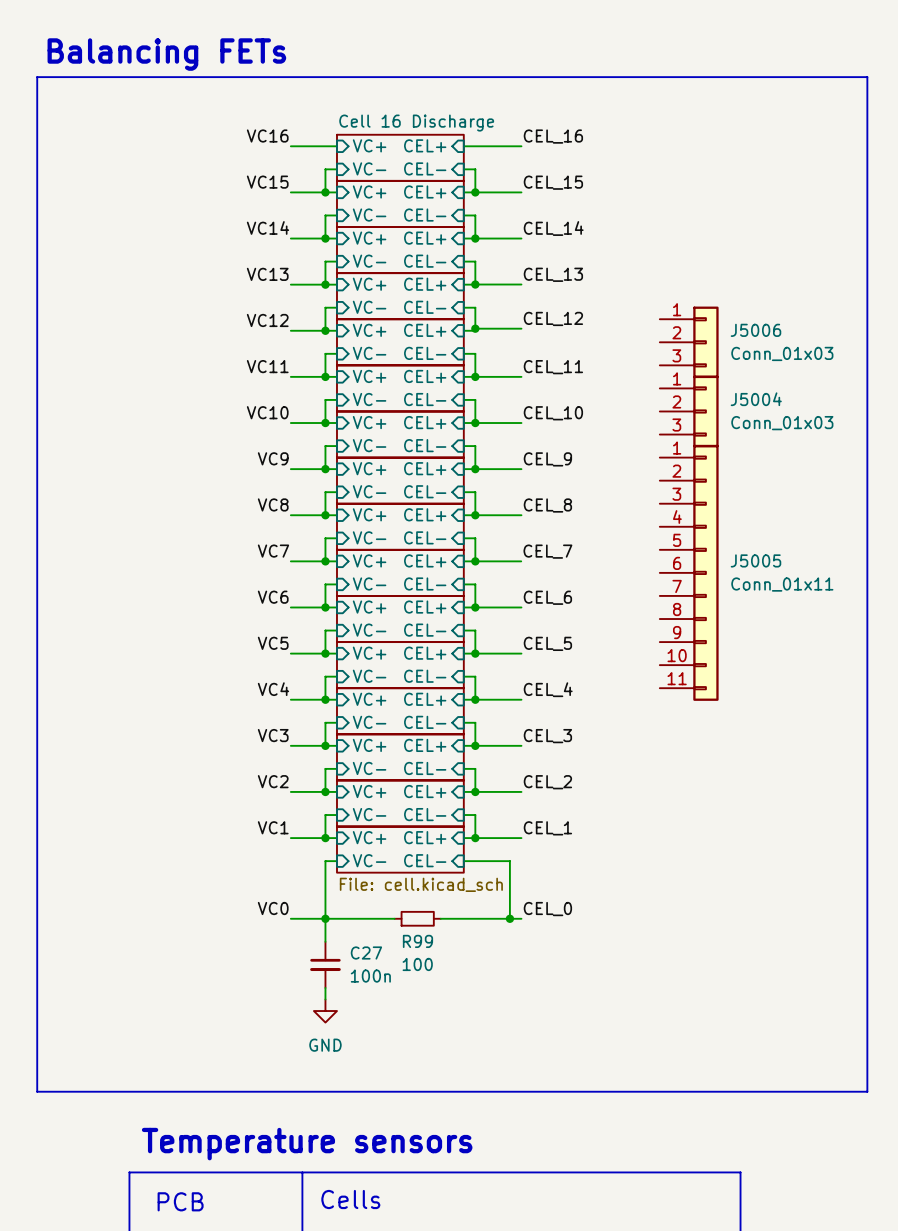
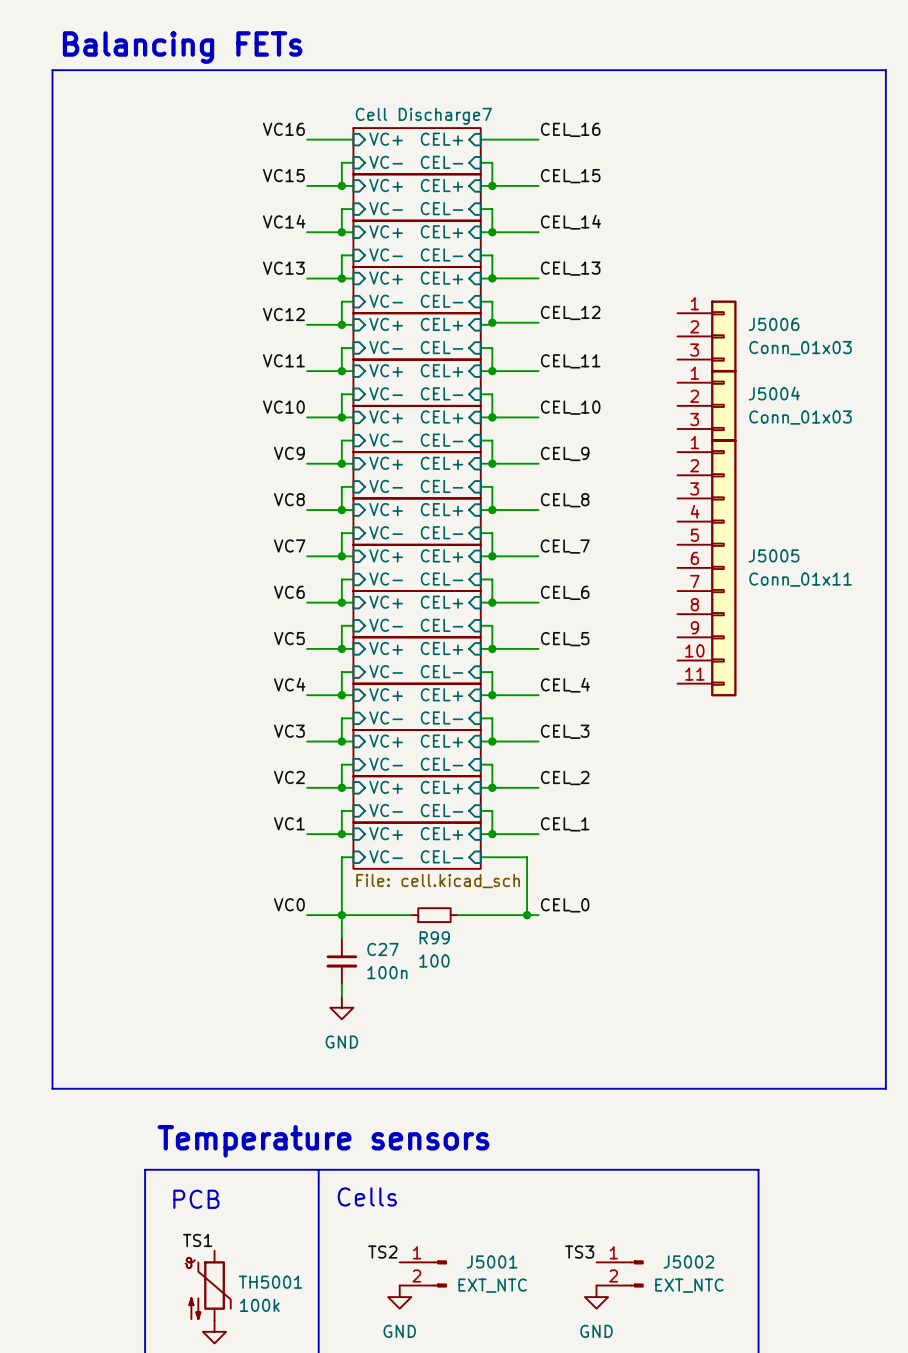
sheet Cell 16 Discharge name: Cell 16 Discharge (416, 123) -> Cell Discharge7 (423, 116)

